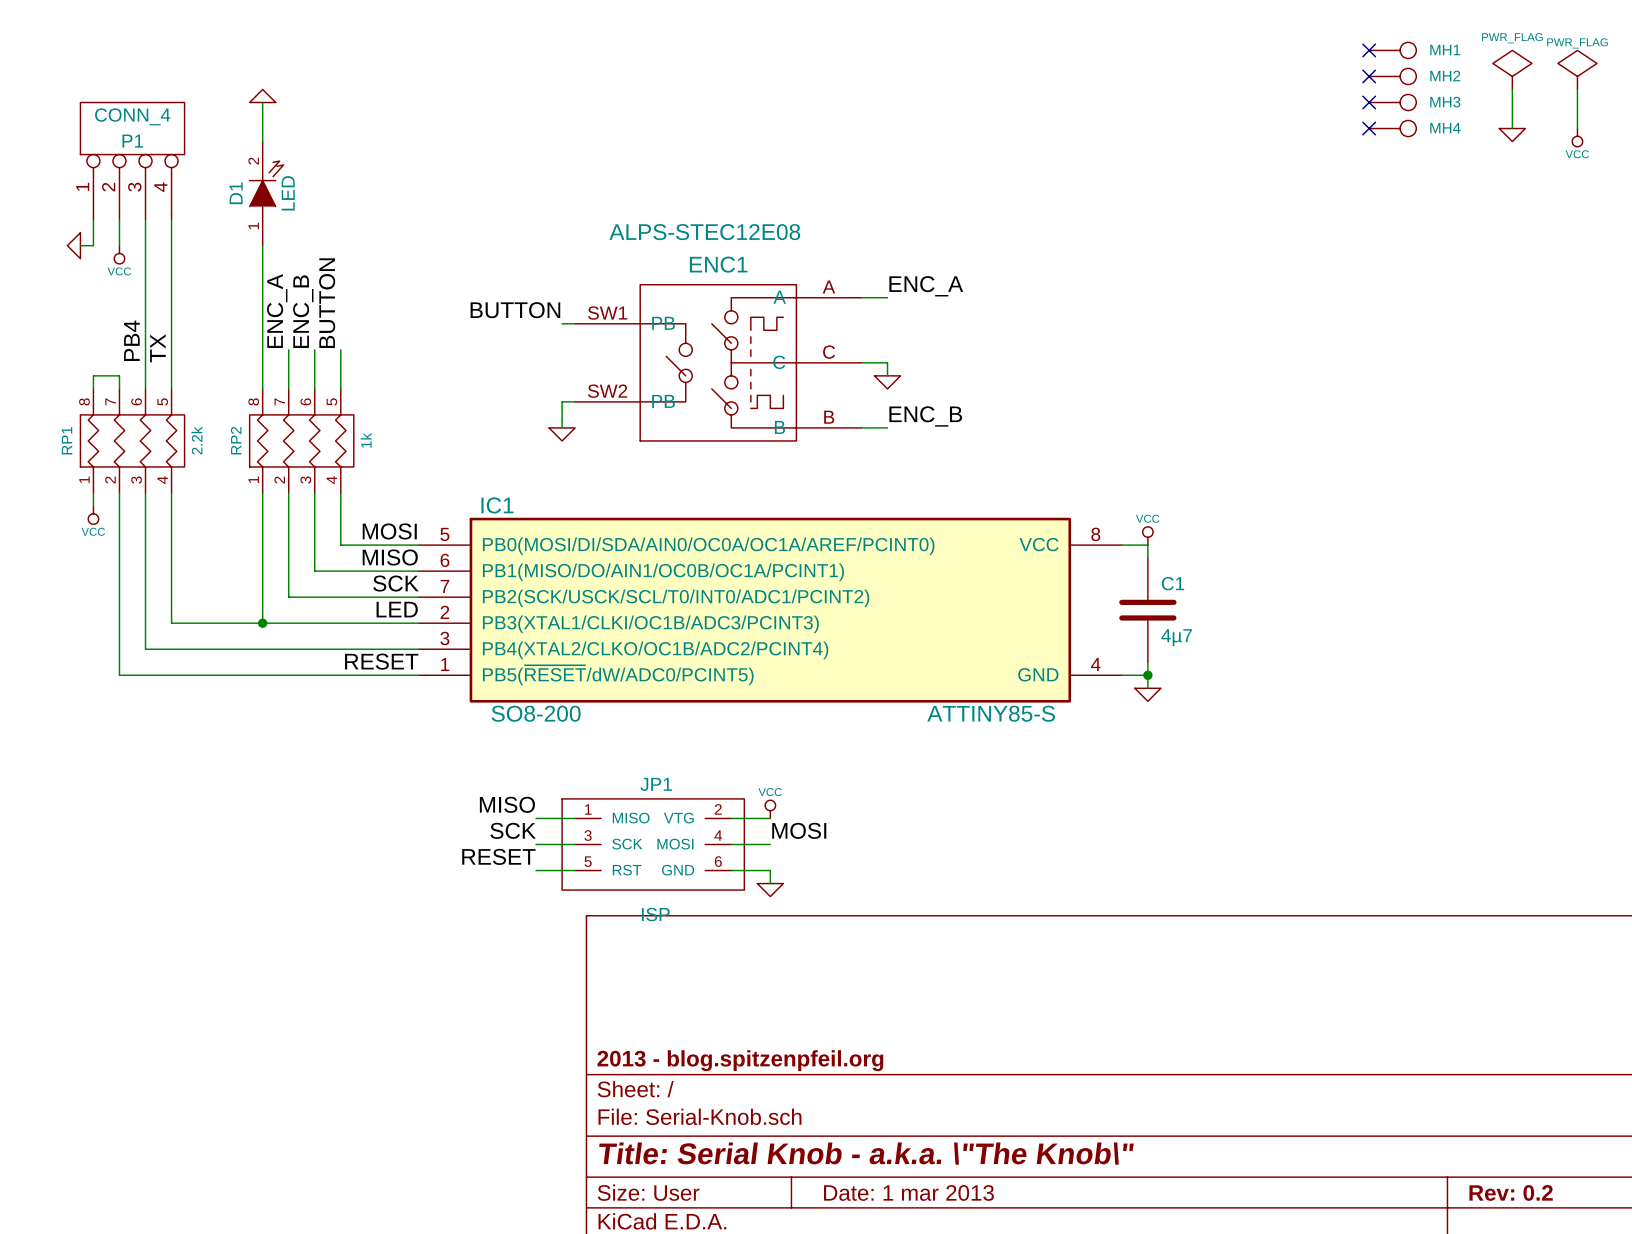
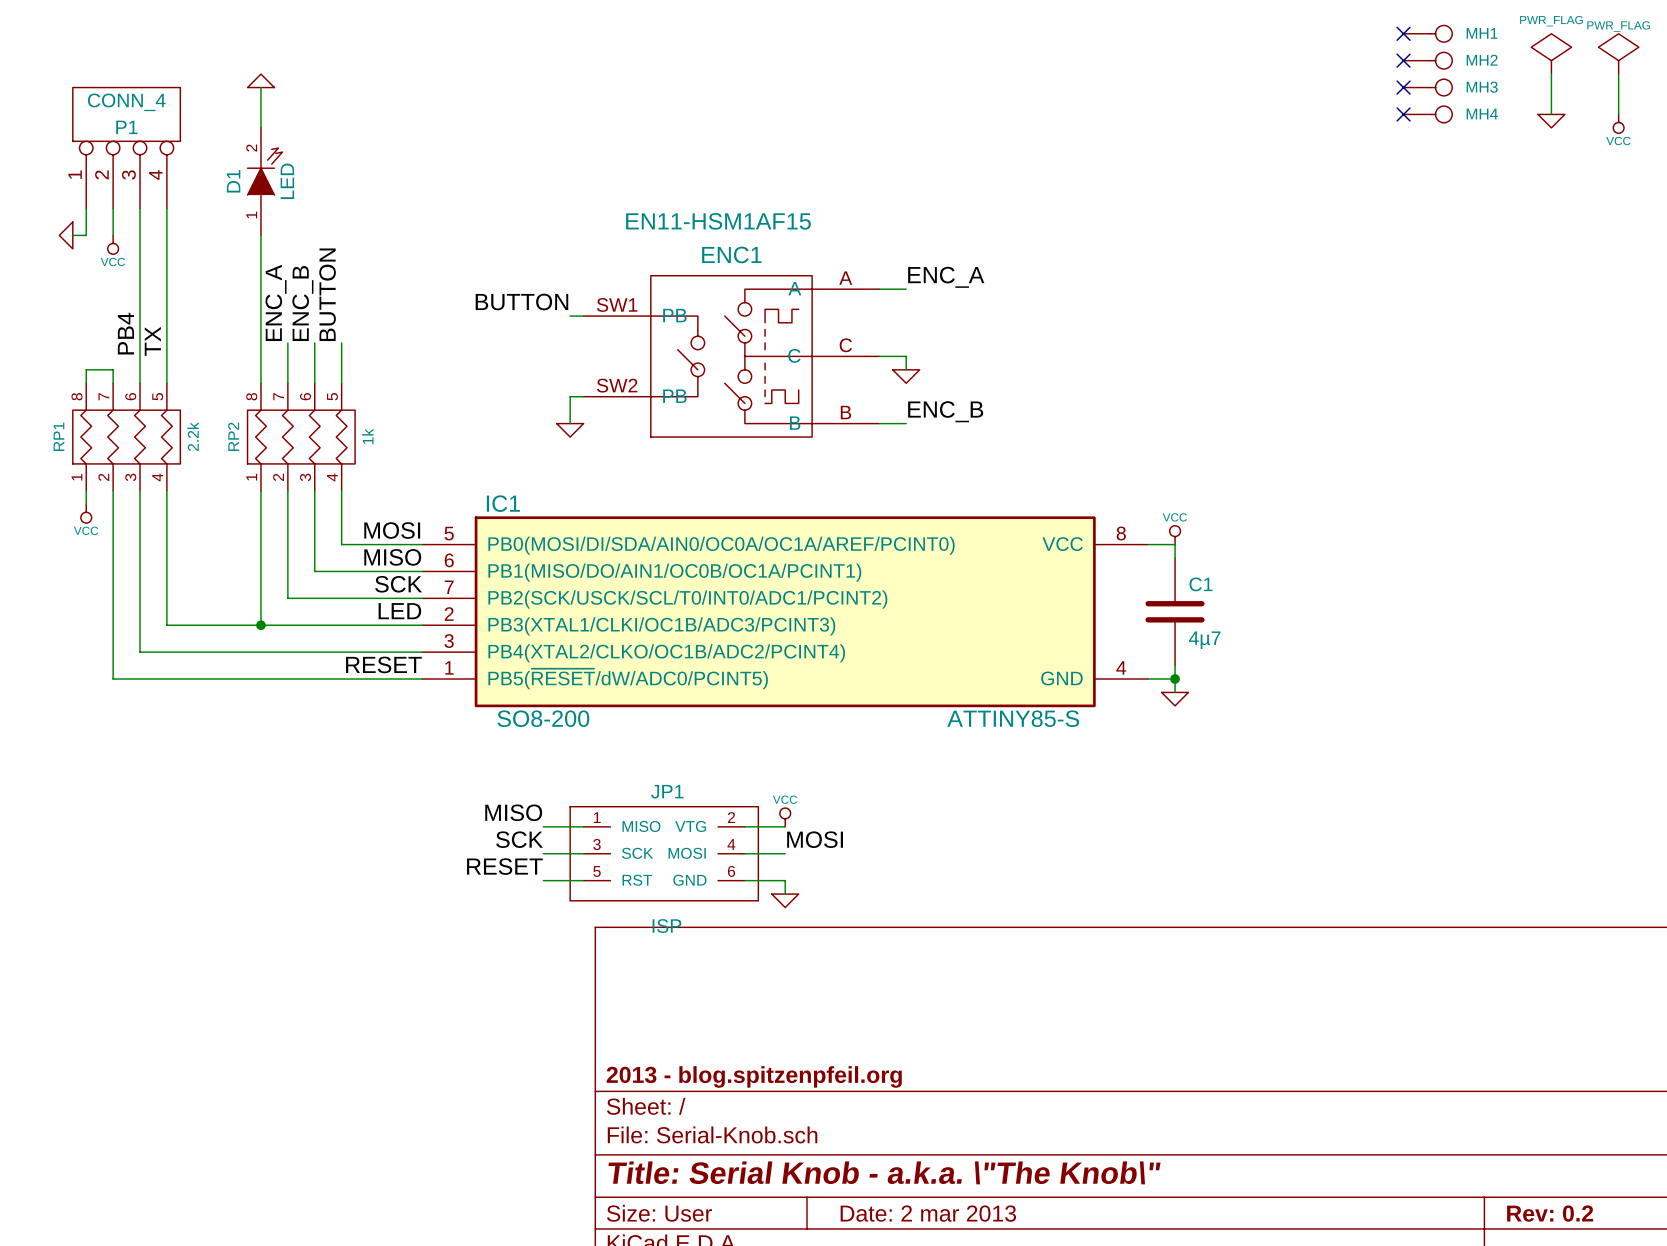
ENC1 value: ALPS-STEC12E08 (704, 232) -> EN11-HSM1AF15 (718, 221)
title block: Date: 1 mar 2013 (908, 1192) -> Date: 2 mar 2013 (928, 1213)

